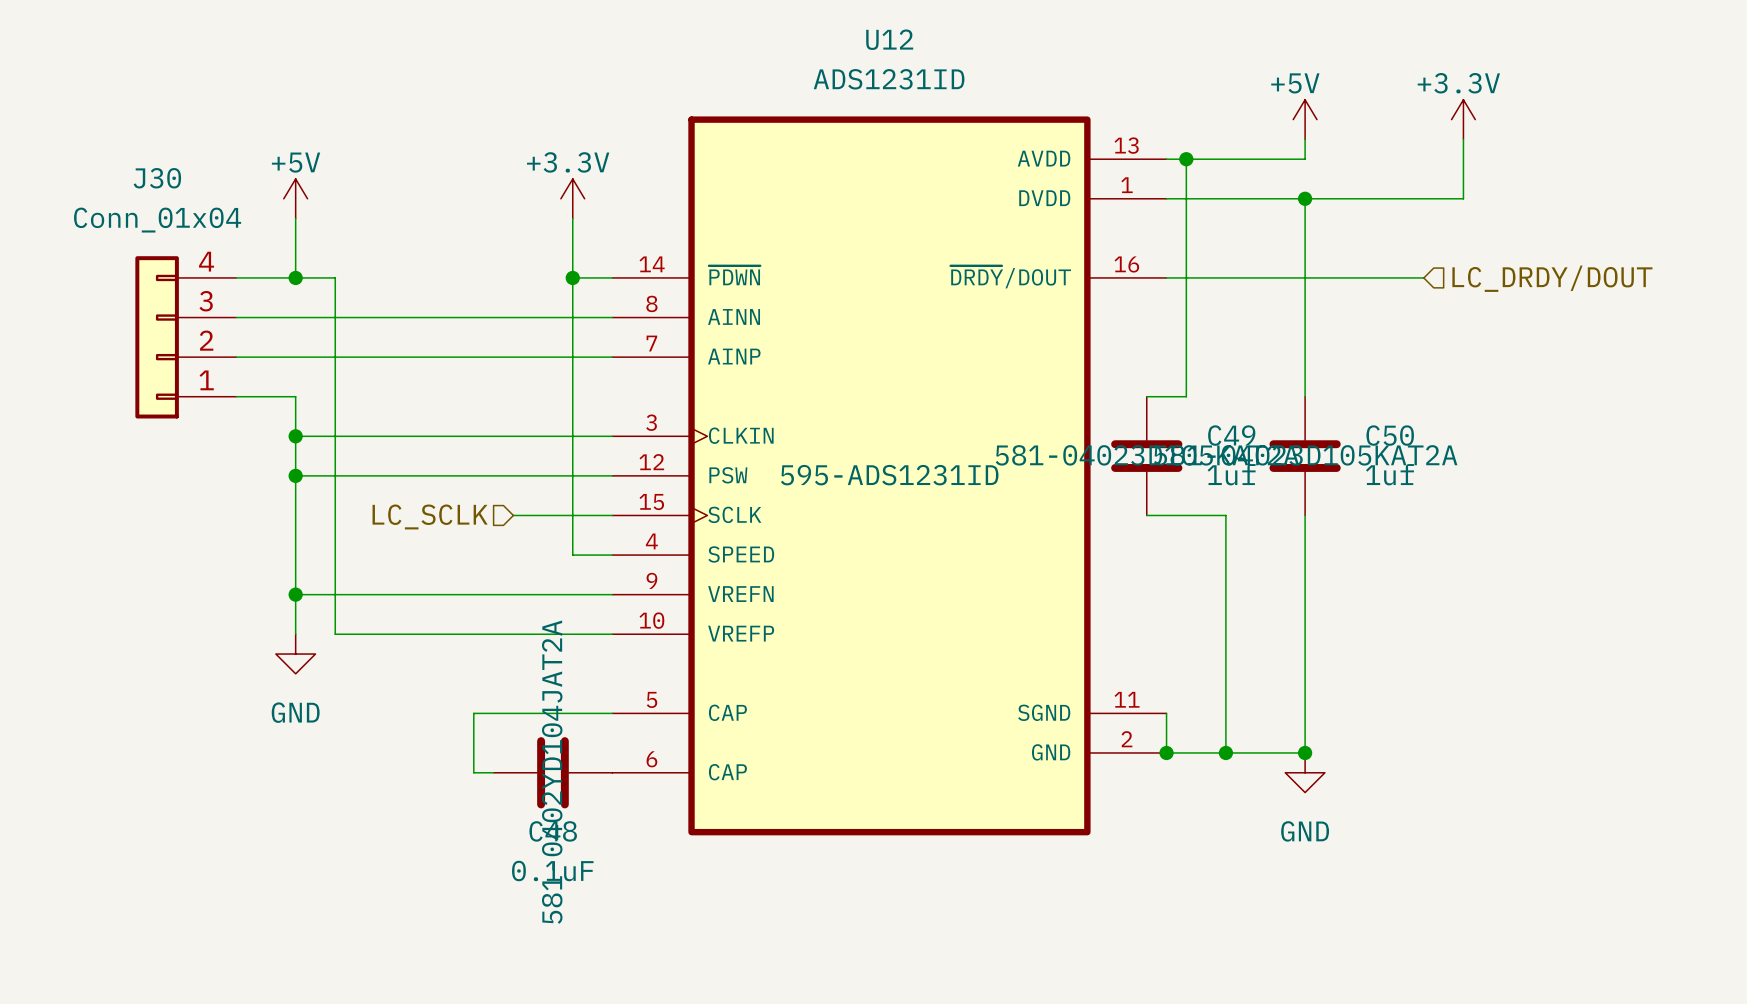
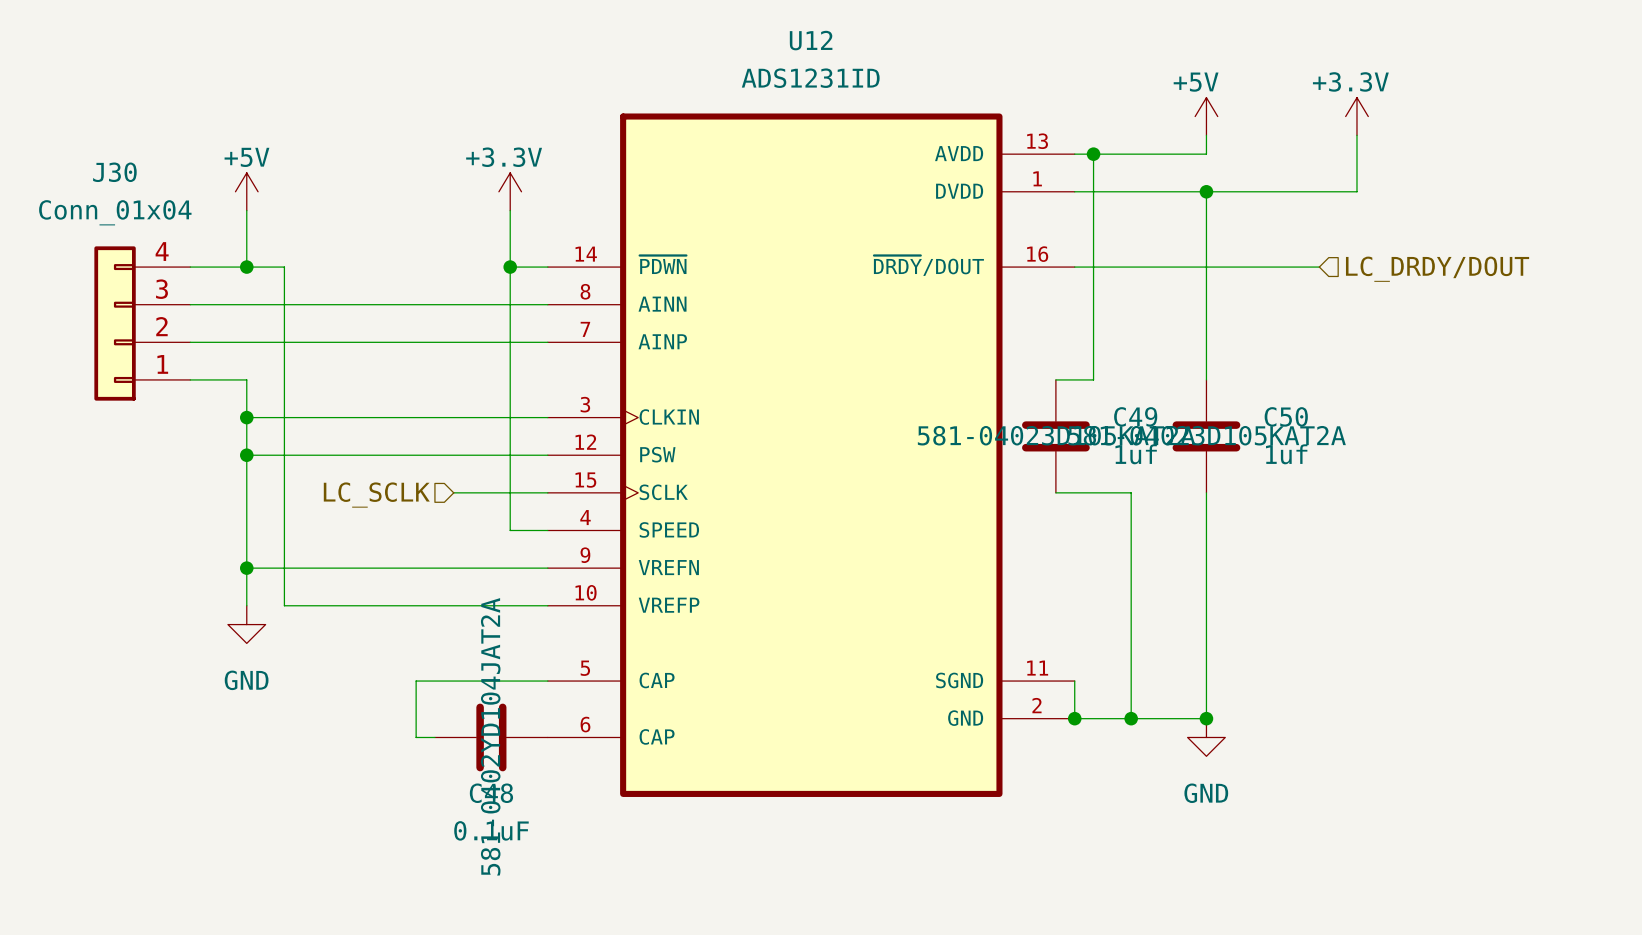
U12 text: 595-ADS1231ID (889, 475) -> none

